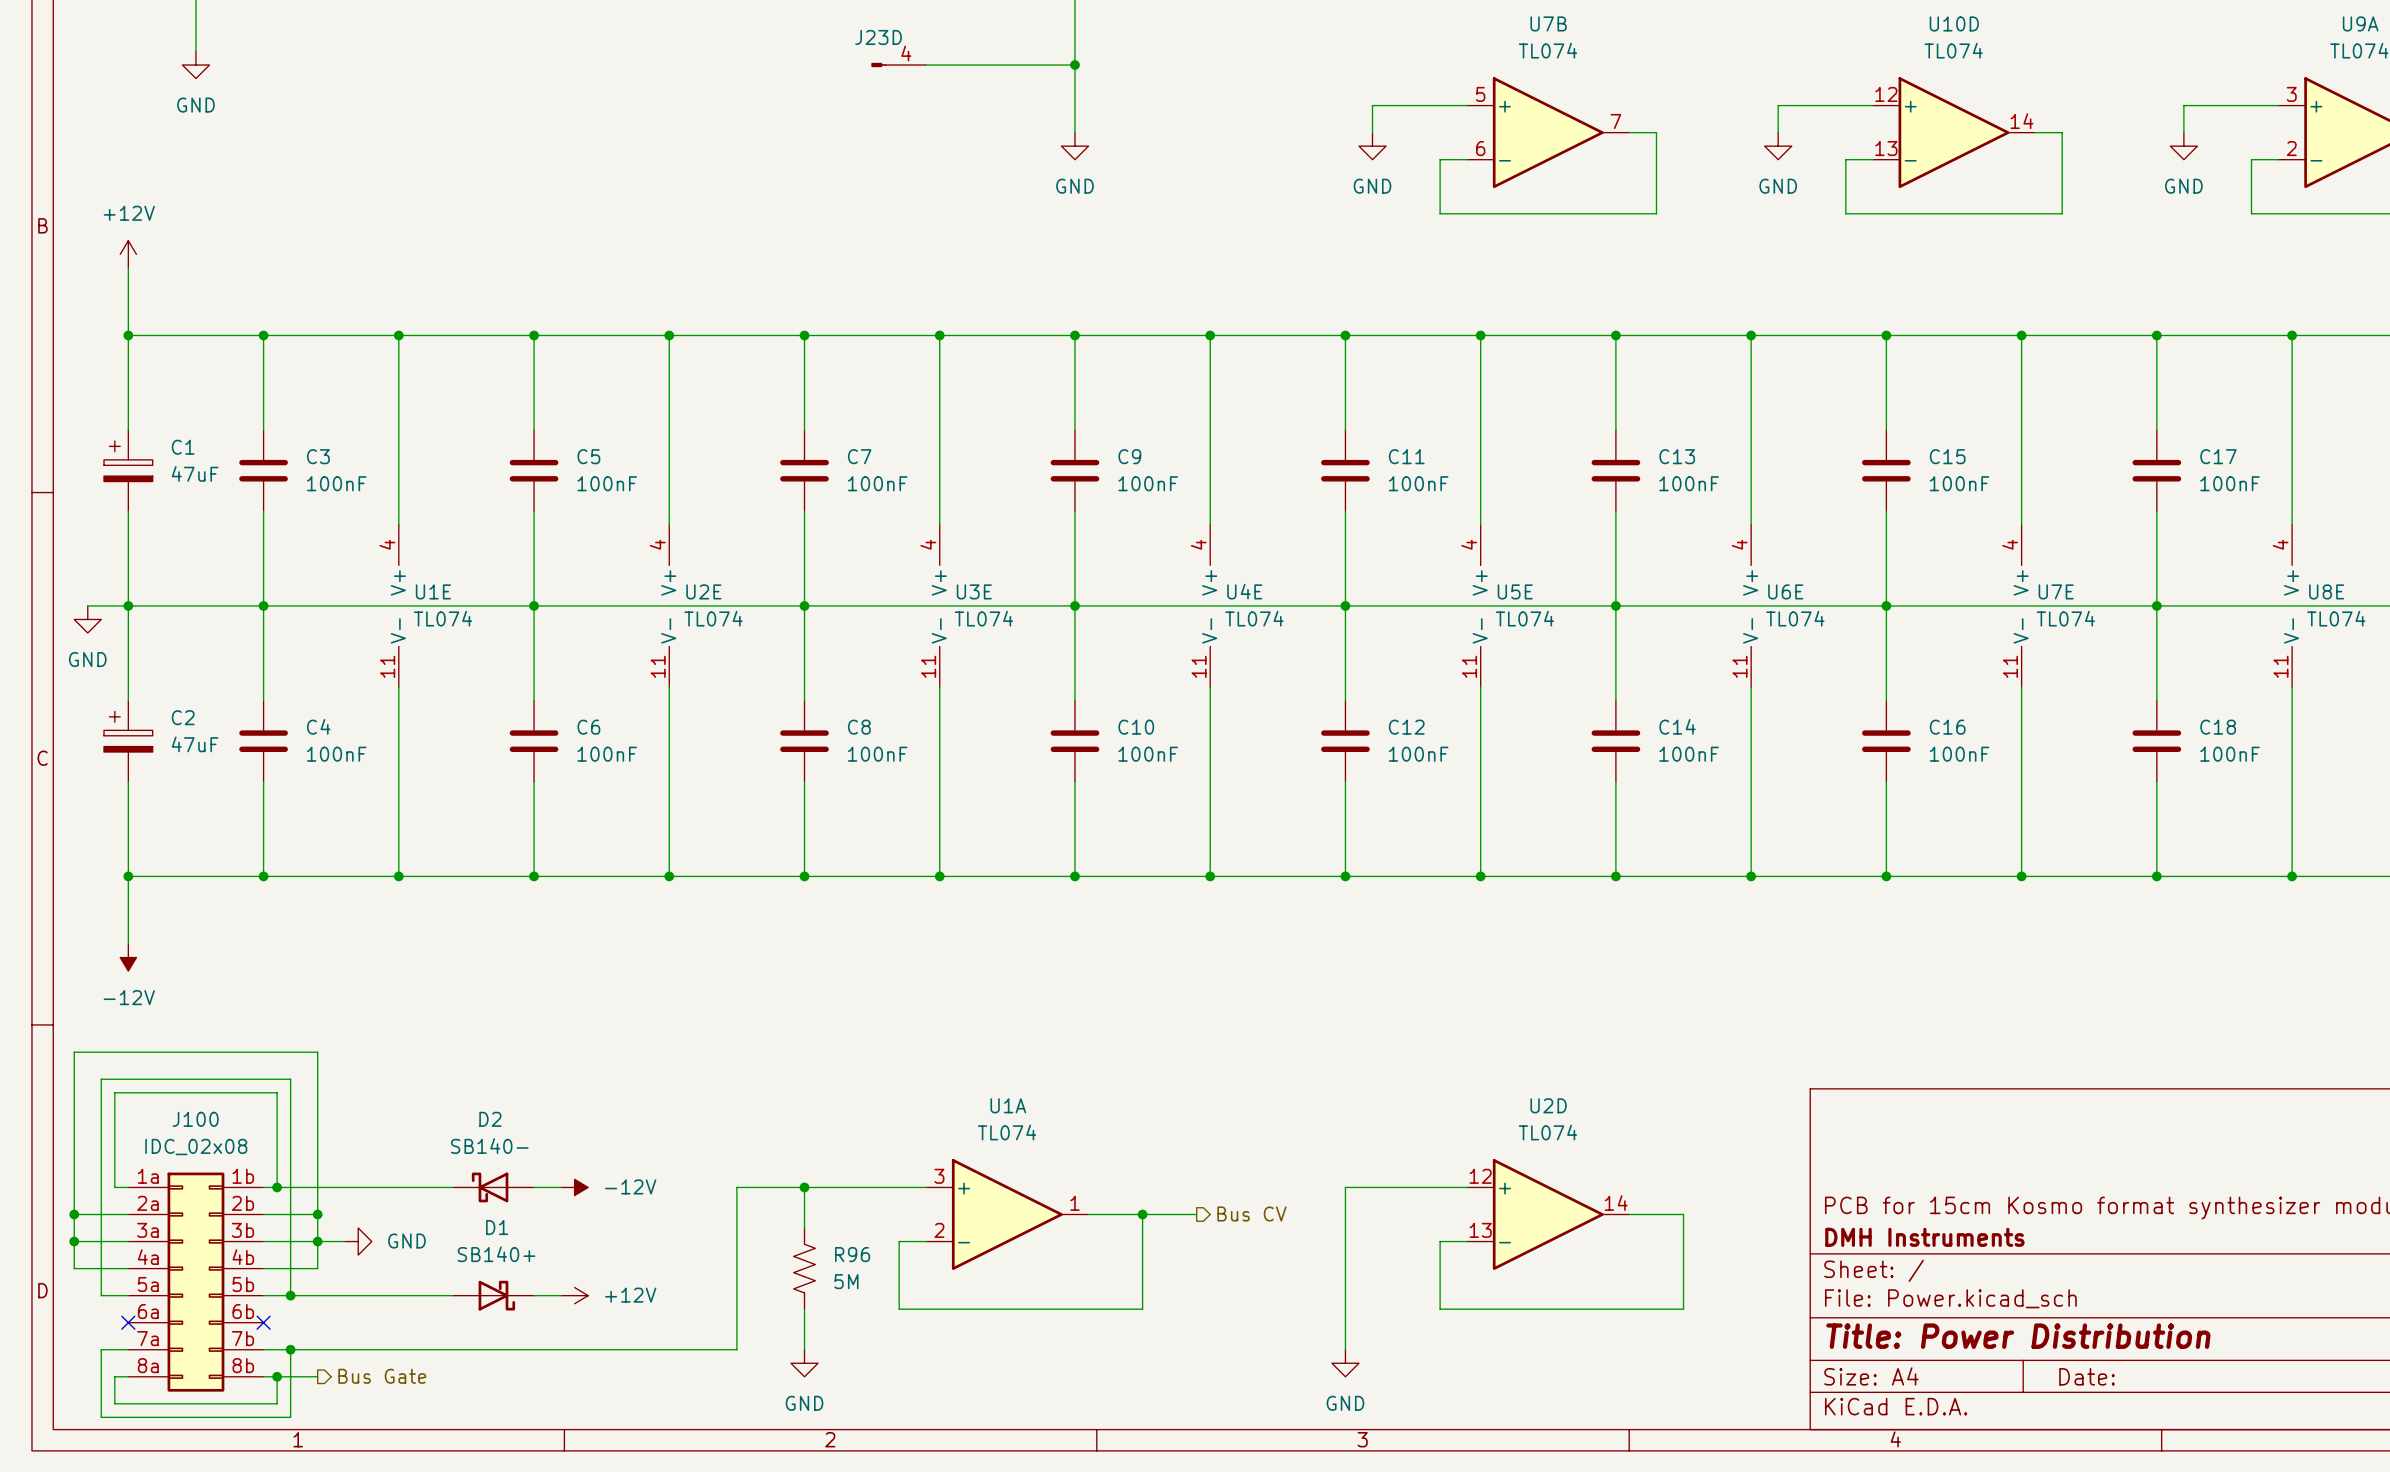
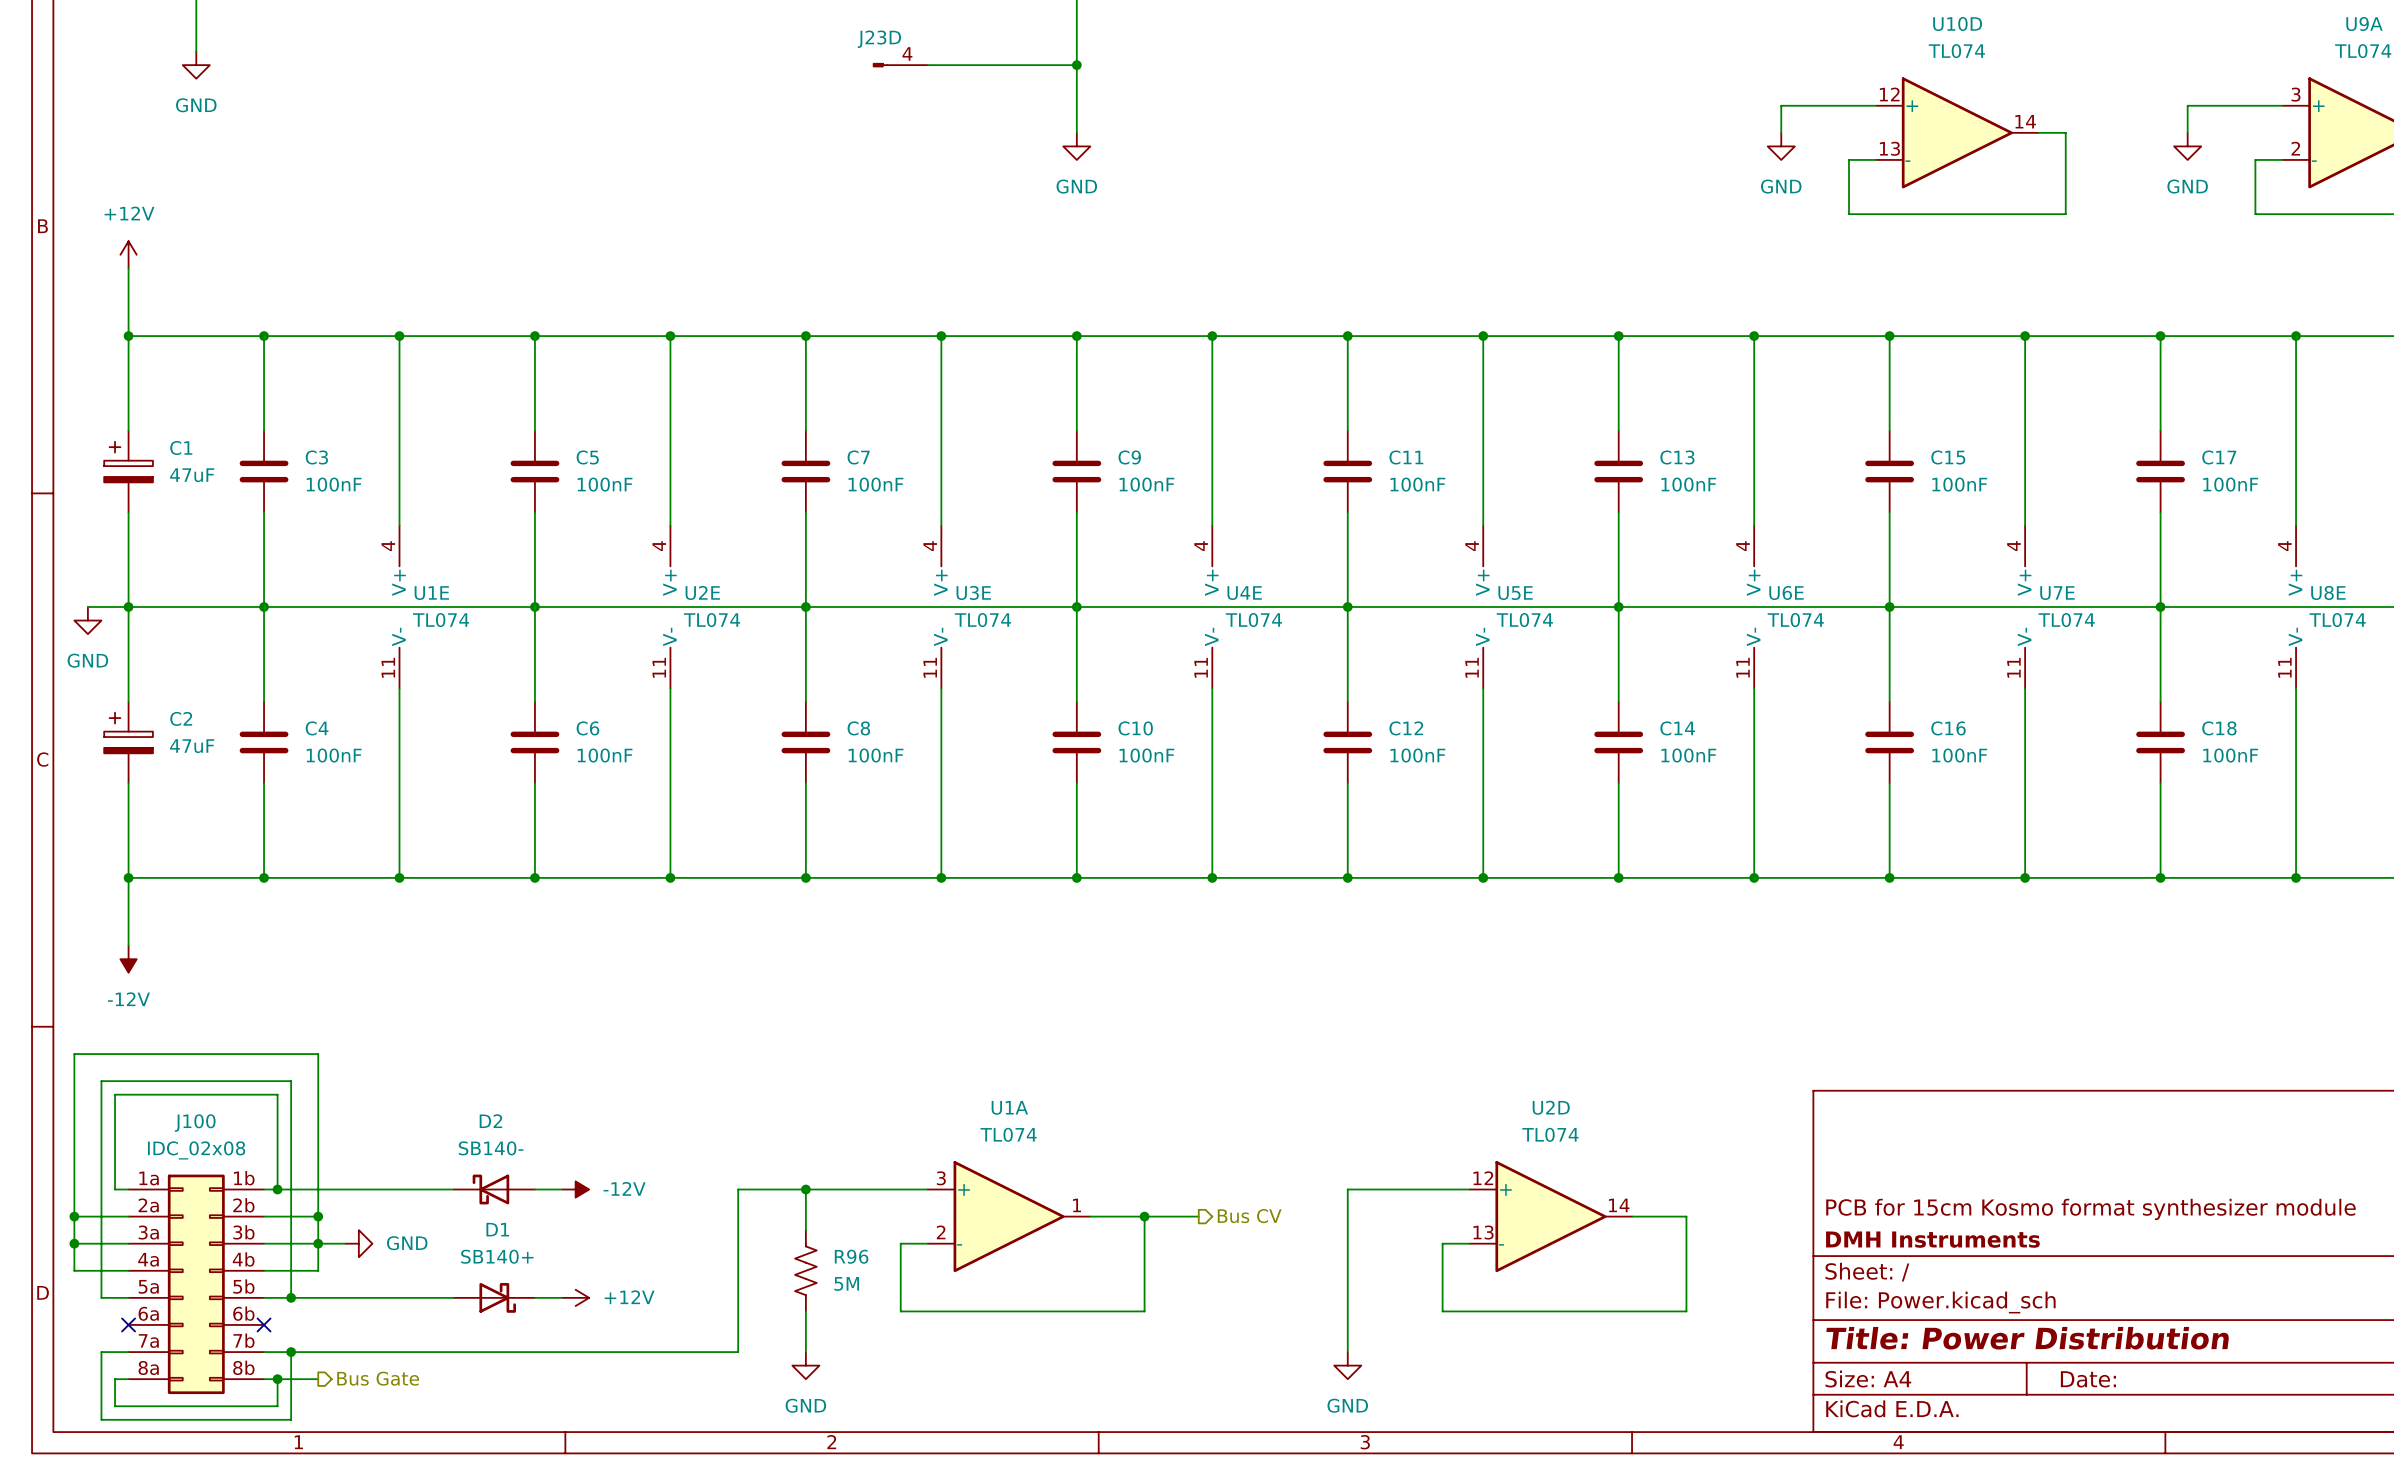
wire: (1467, 105) (1372, 105) (1372, 132) -> none
U7B: TL074 (1548, 132) -> none
wire: (1629, 132) (1656, 132) (1656, 213) (1440, 213) (1440, 159) (1467, 159) -> none
power symbol: GND (1372, 146) -> none

